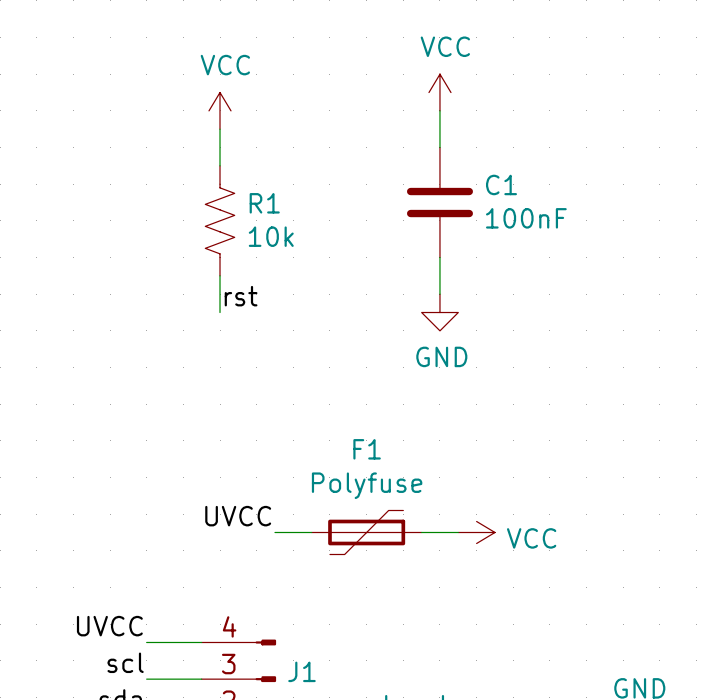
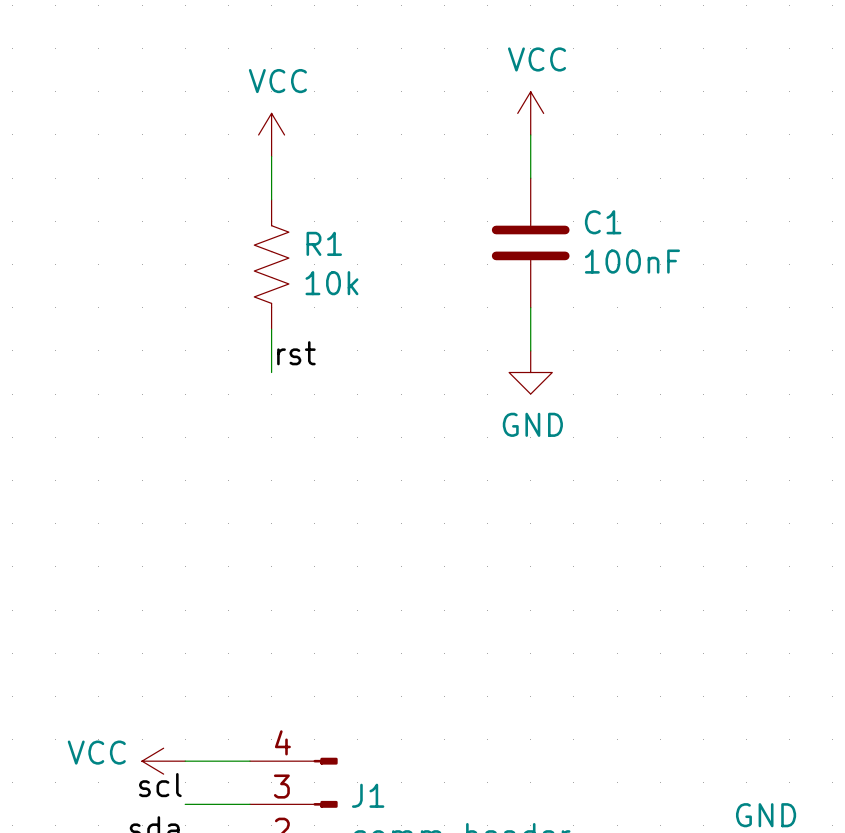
label: UVCC (238, 516) -> none
wire: (274, 532) (311, 532) -> none
F1: Polyfuse (366, 532) -> none
wire: (421, 532) (458, 532) -> none
power symbol: VCC (476, 532) -> none
label: UVCC (109, 626) -> none
power symbol: none -> VCC (163, 761)

